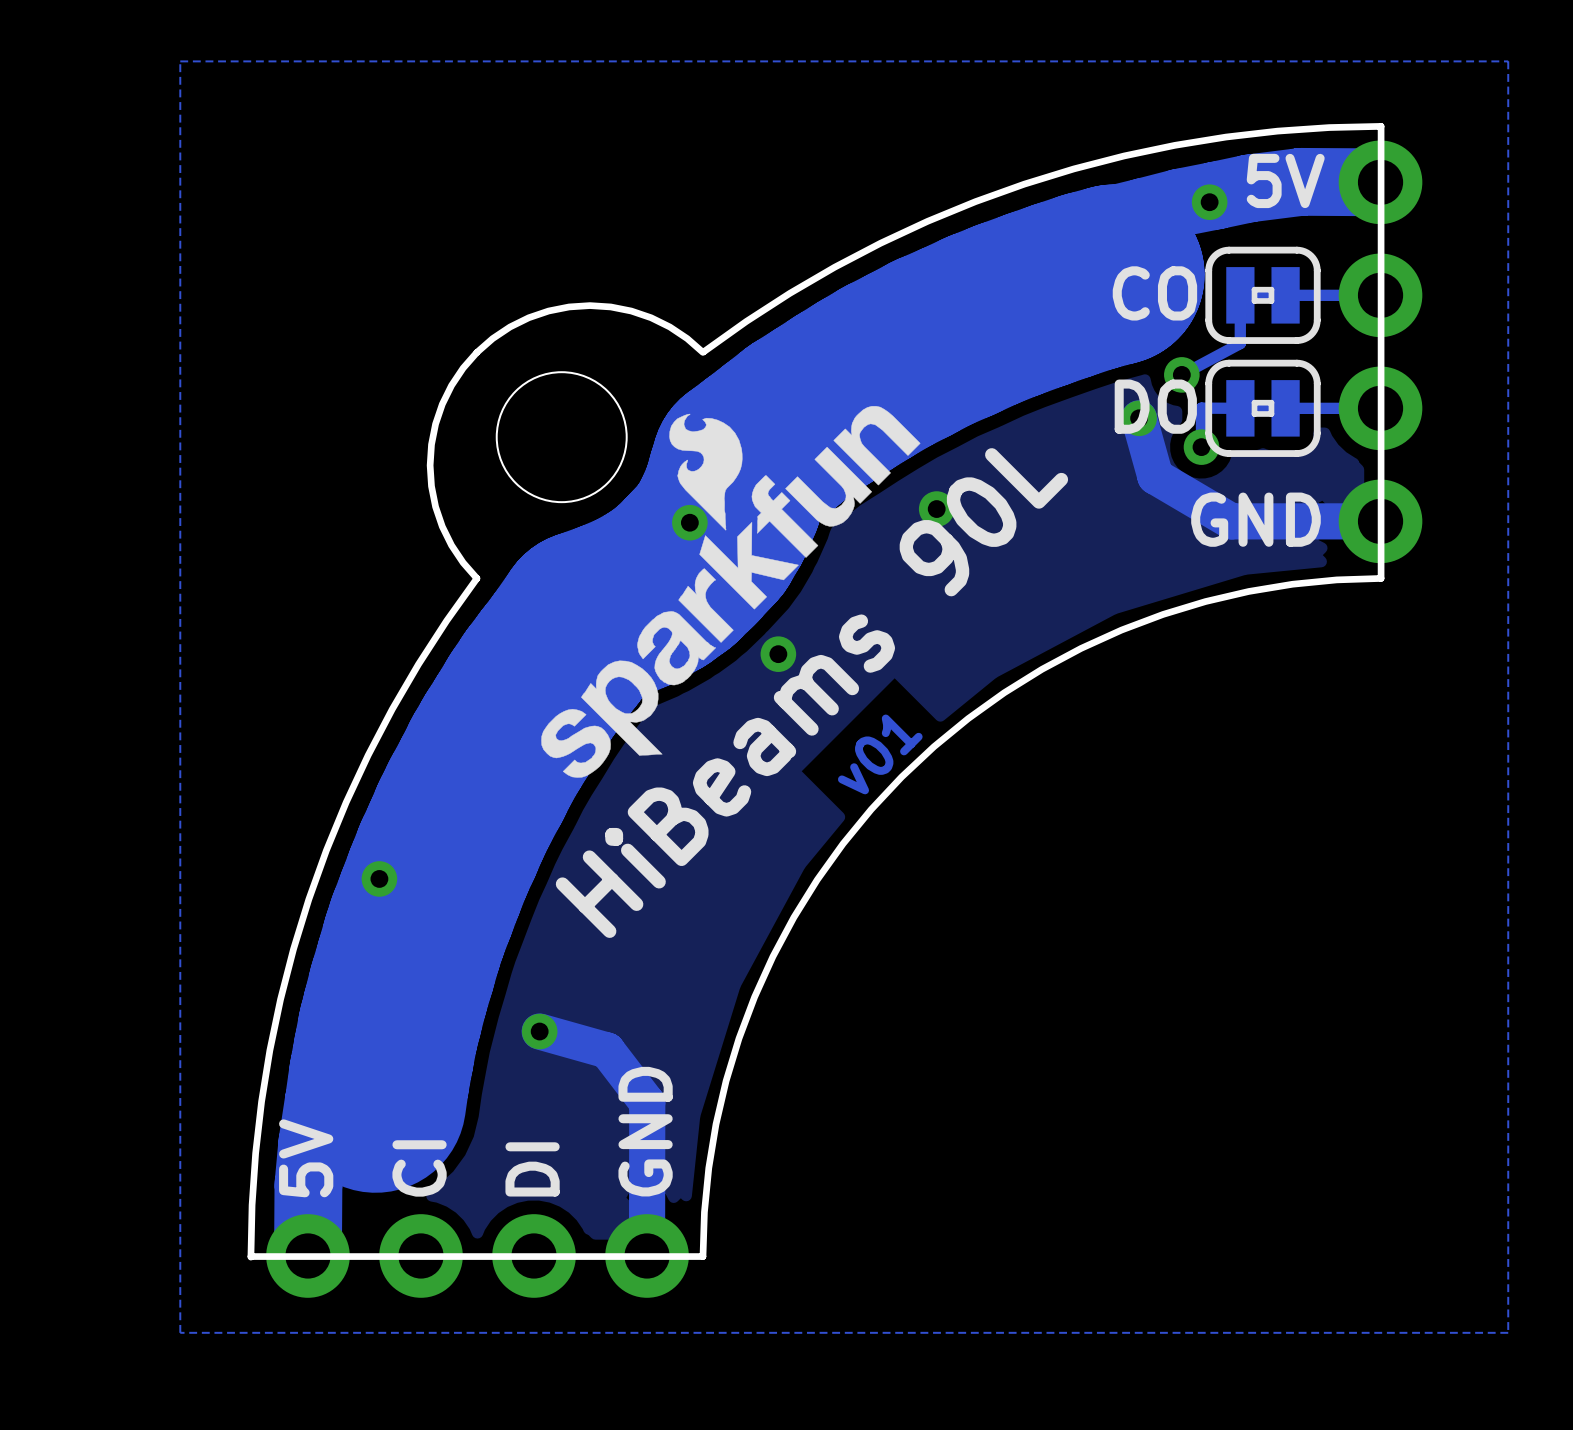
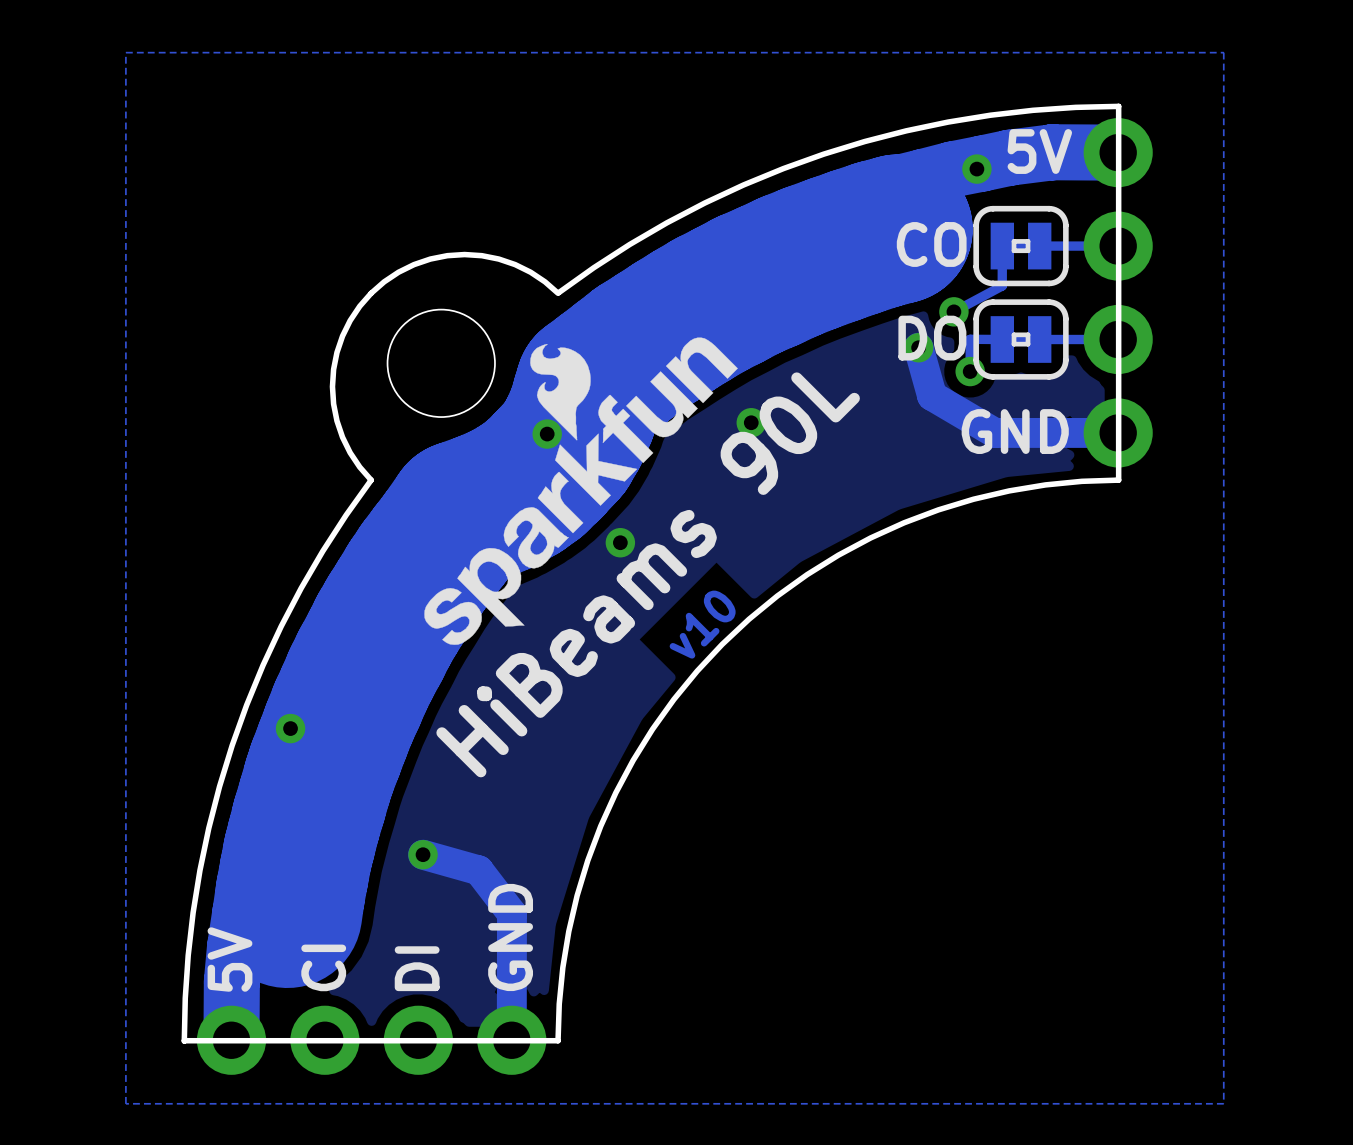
text: v01 (880, 754) -> v10 (702, 624)

